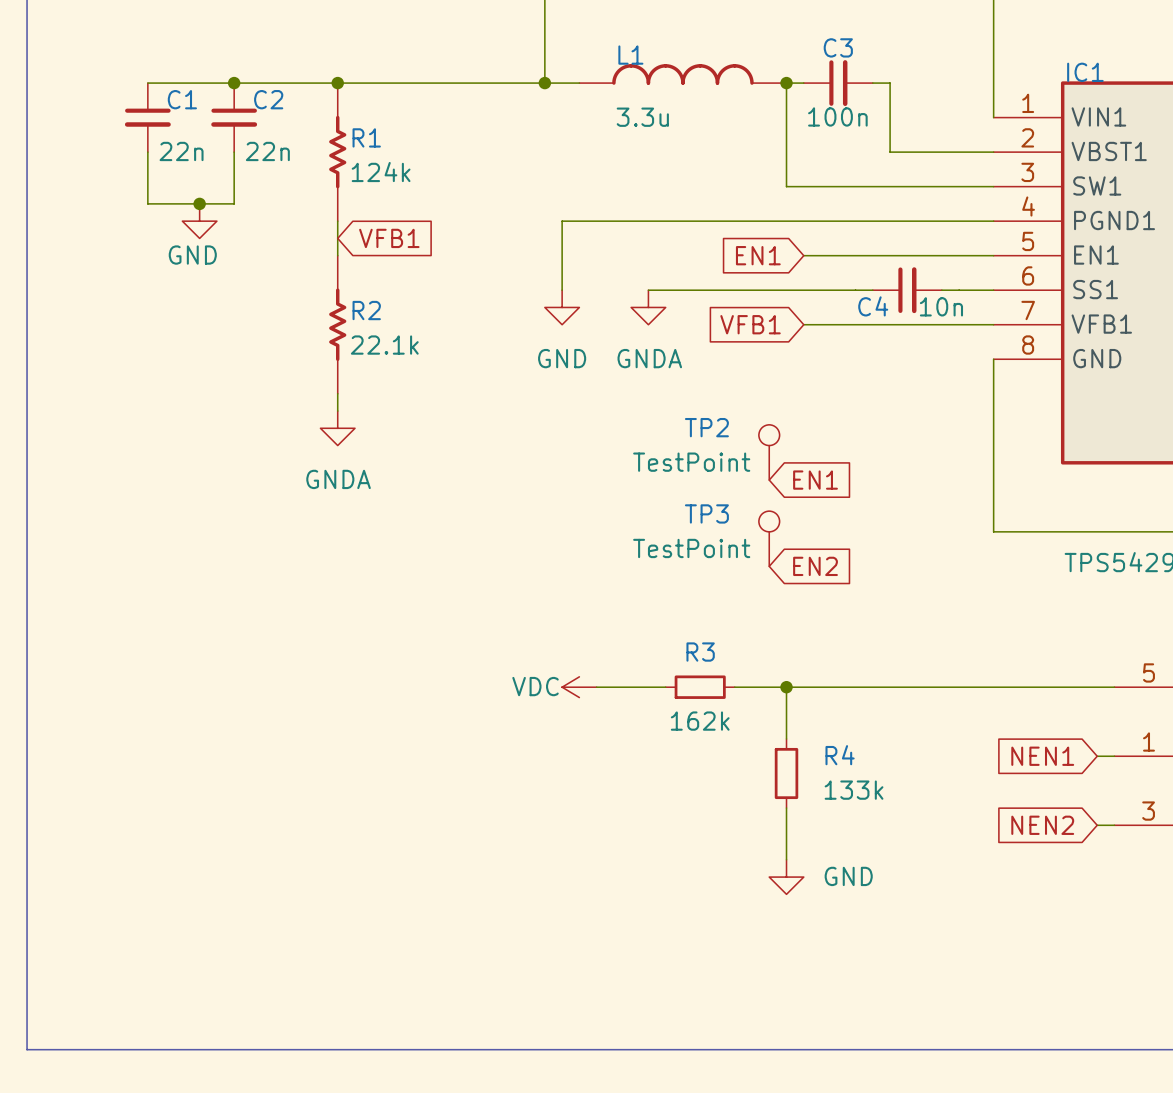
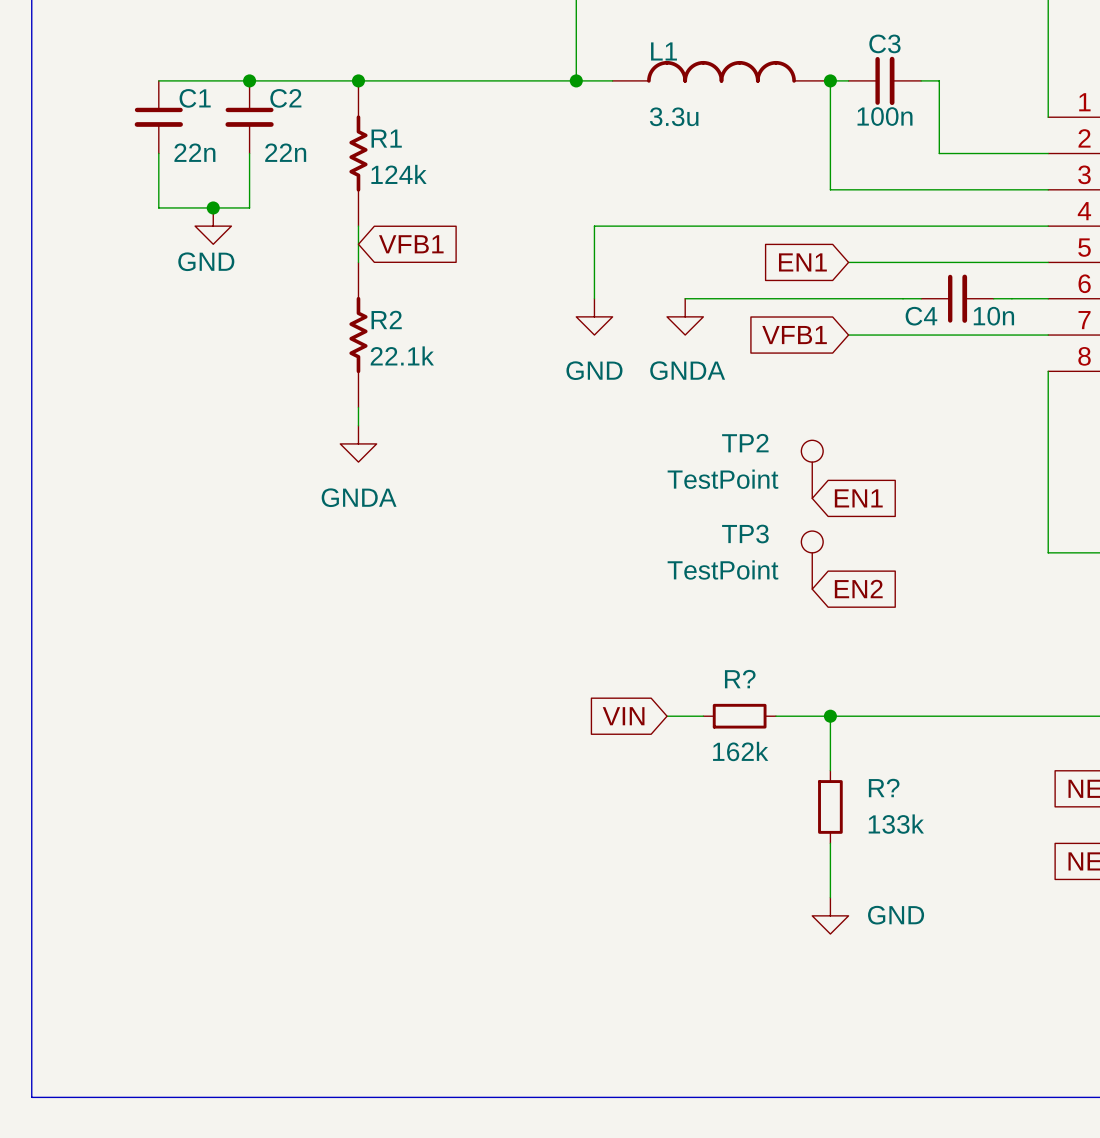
R3 name: R3 (700, 652) -> R? (740, 679)
power symbol: VDC (579, 687) -> none
global label: none -> VIN (623, 716)
wire: (596, 687) (631, 687) -> none
R4 name: R4 (840, 755) -> R? (884, 788)

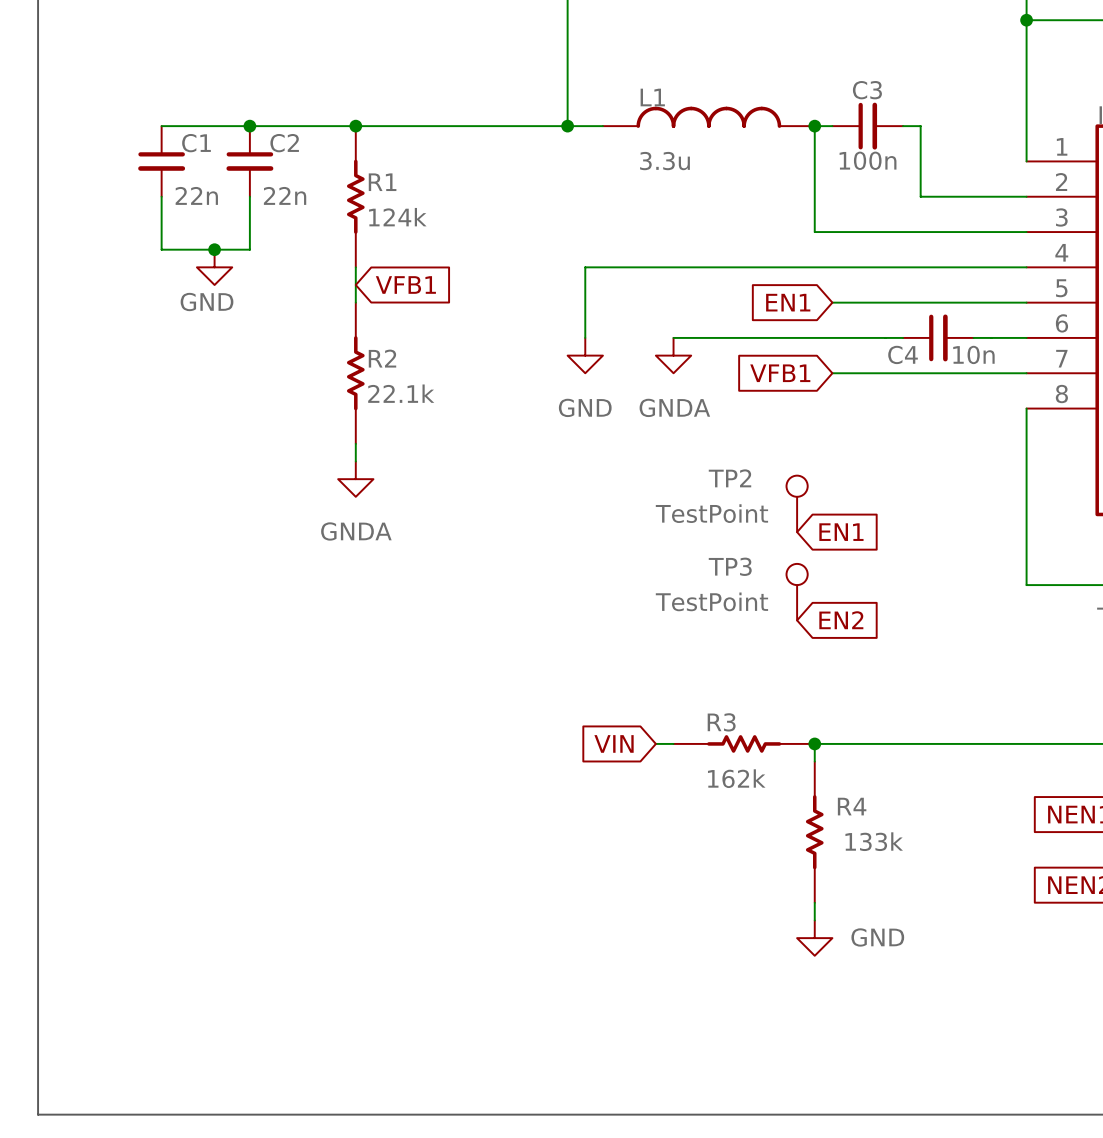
R?: 162k (739, 716) -> none
R3: none -> (744, 743)
R?: 133k (830, 806) -> none
R4: none -> (814, 832)

